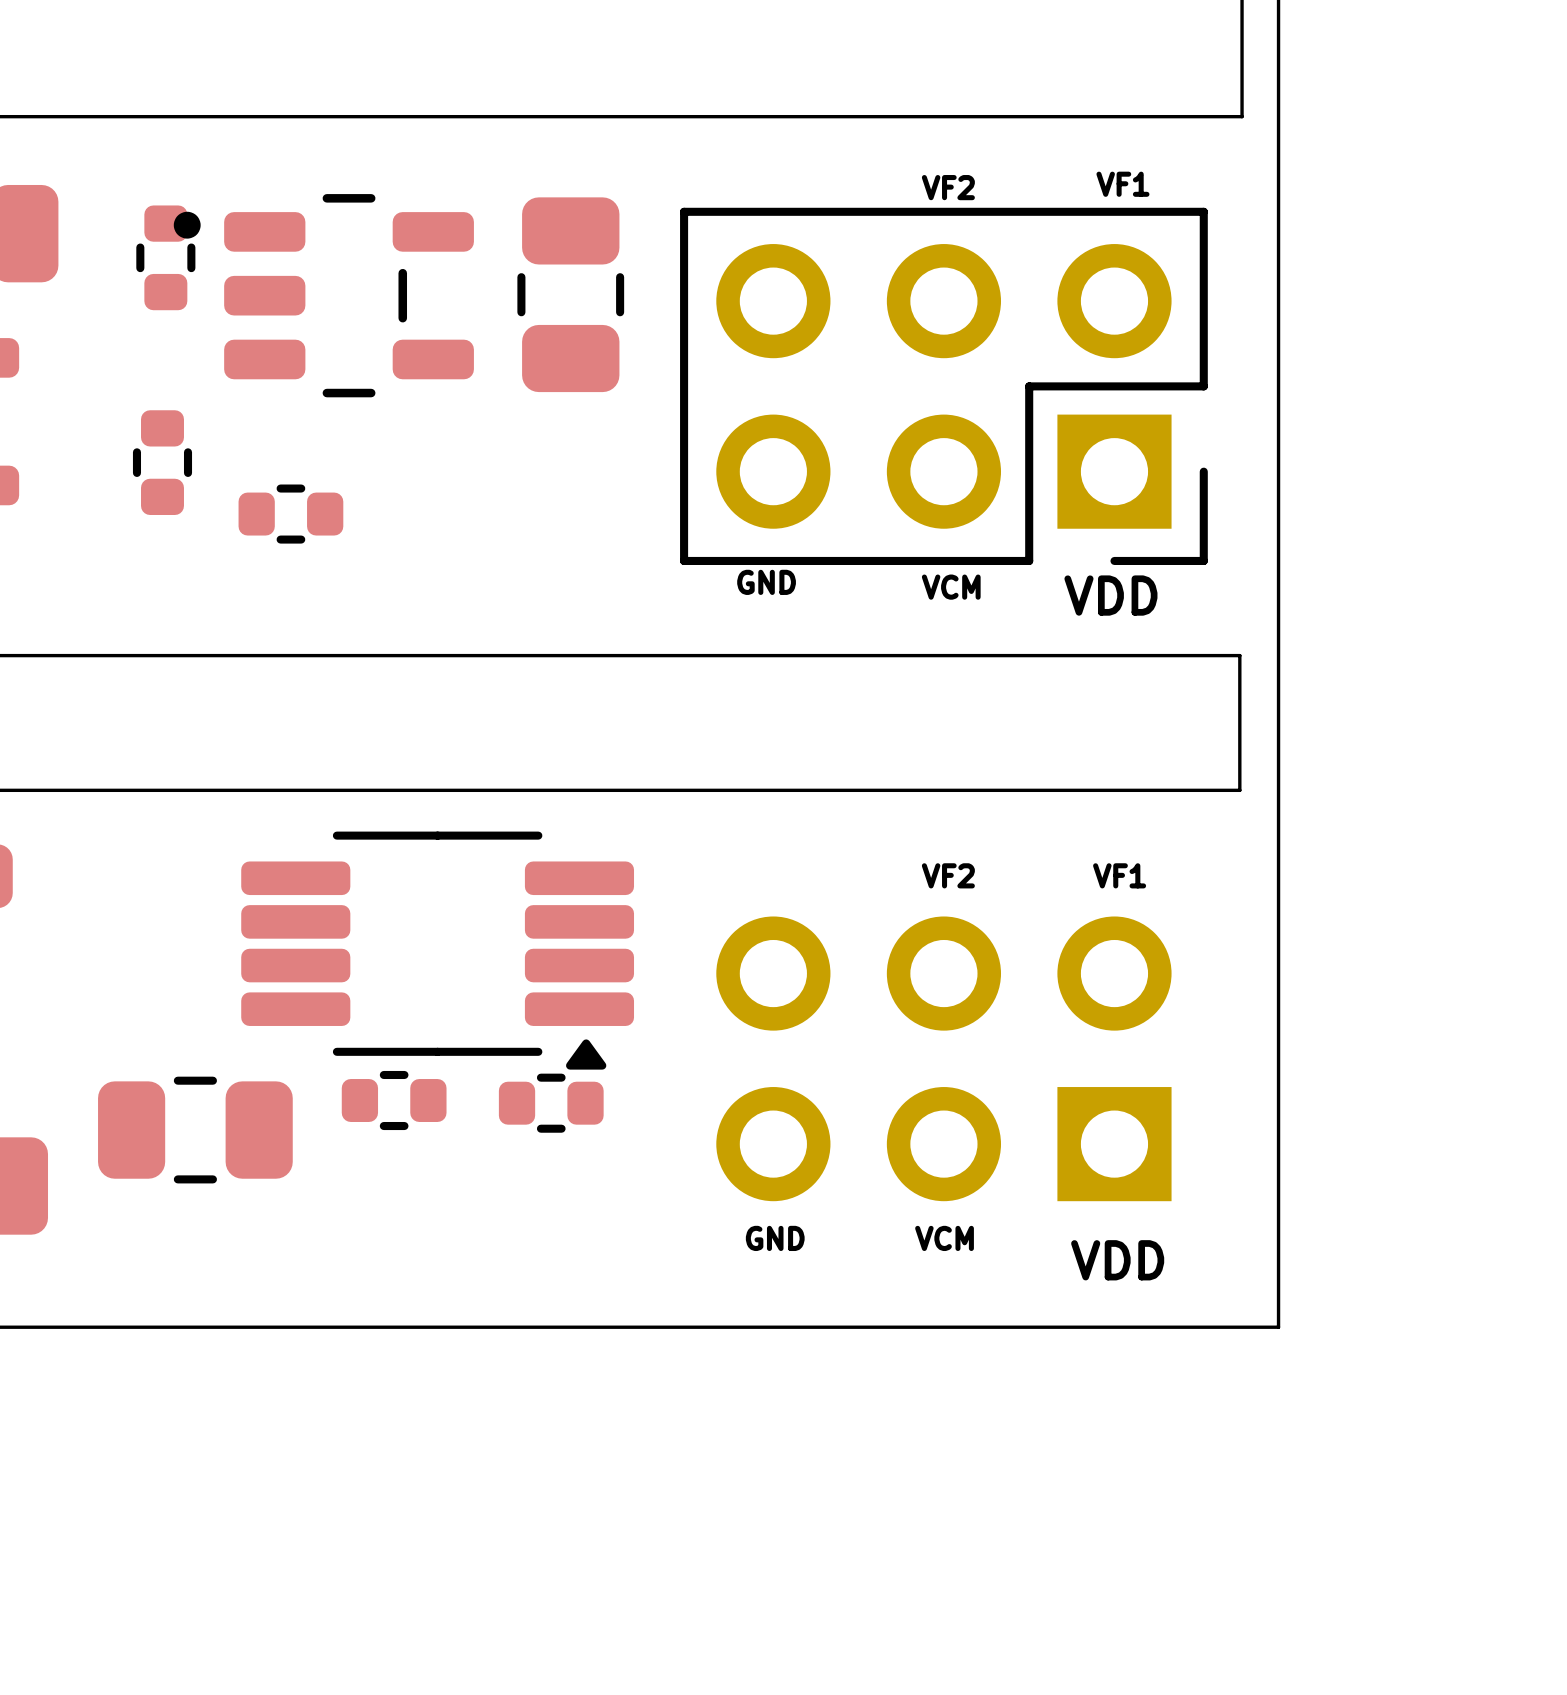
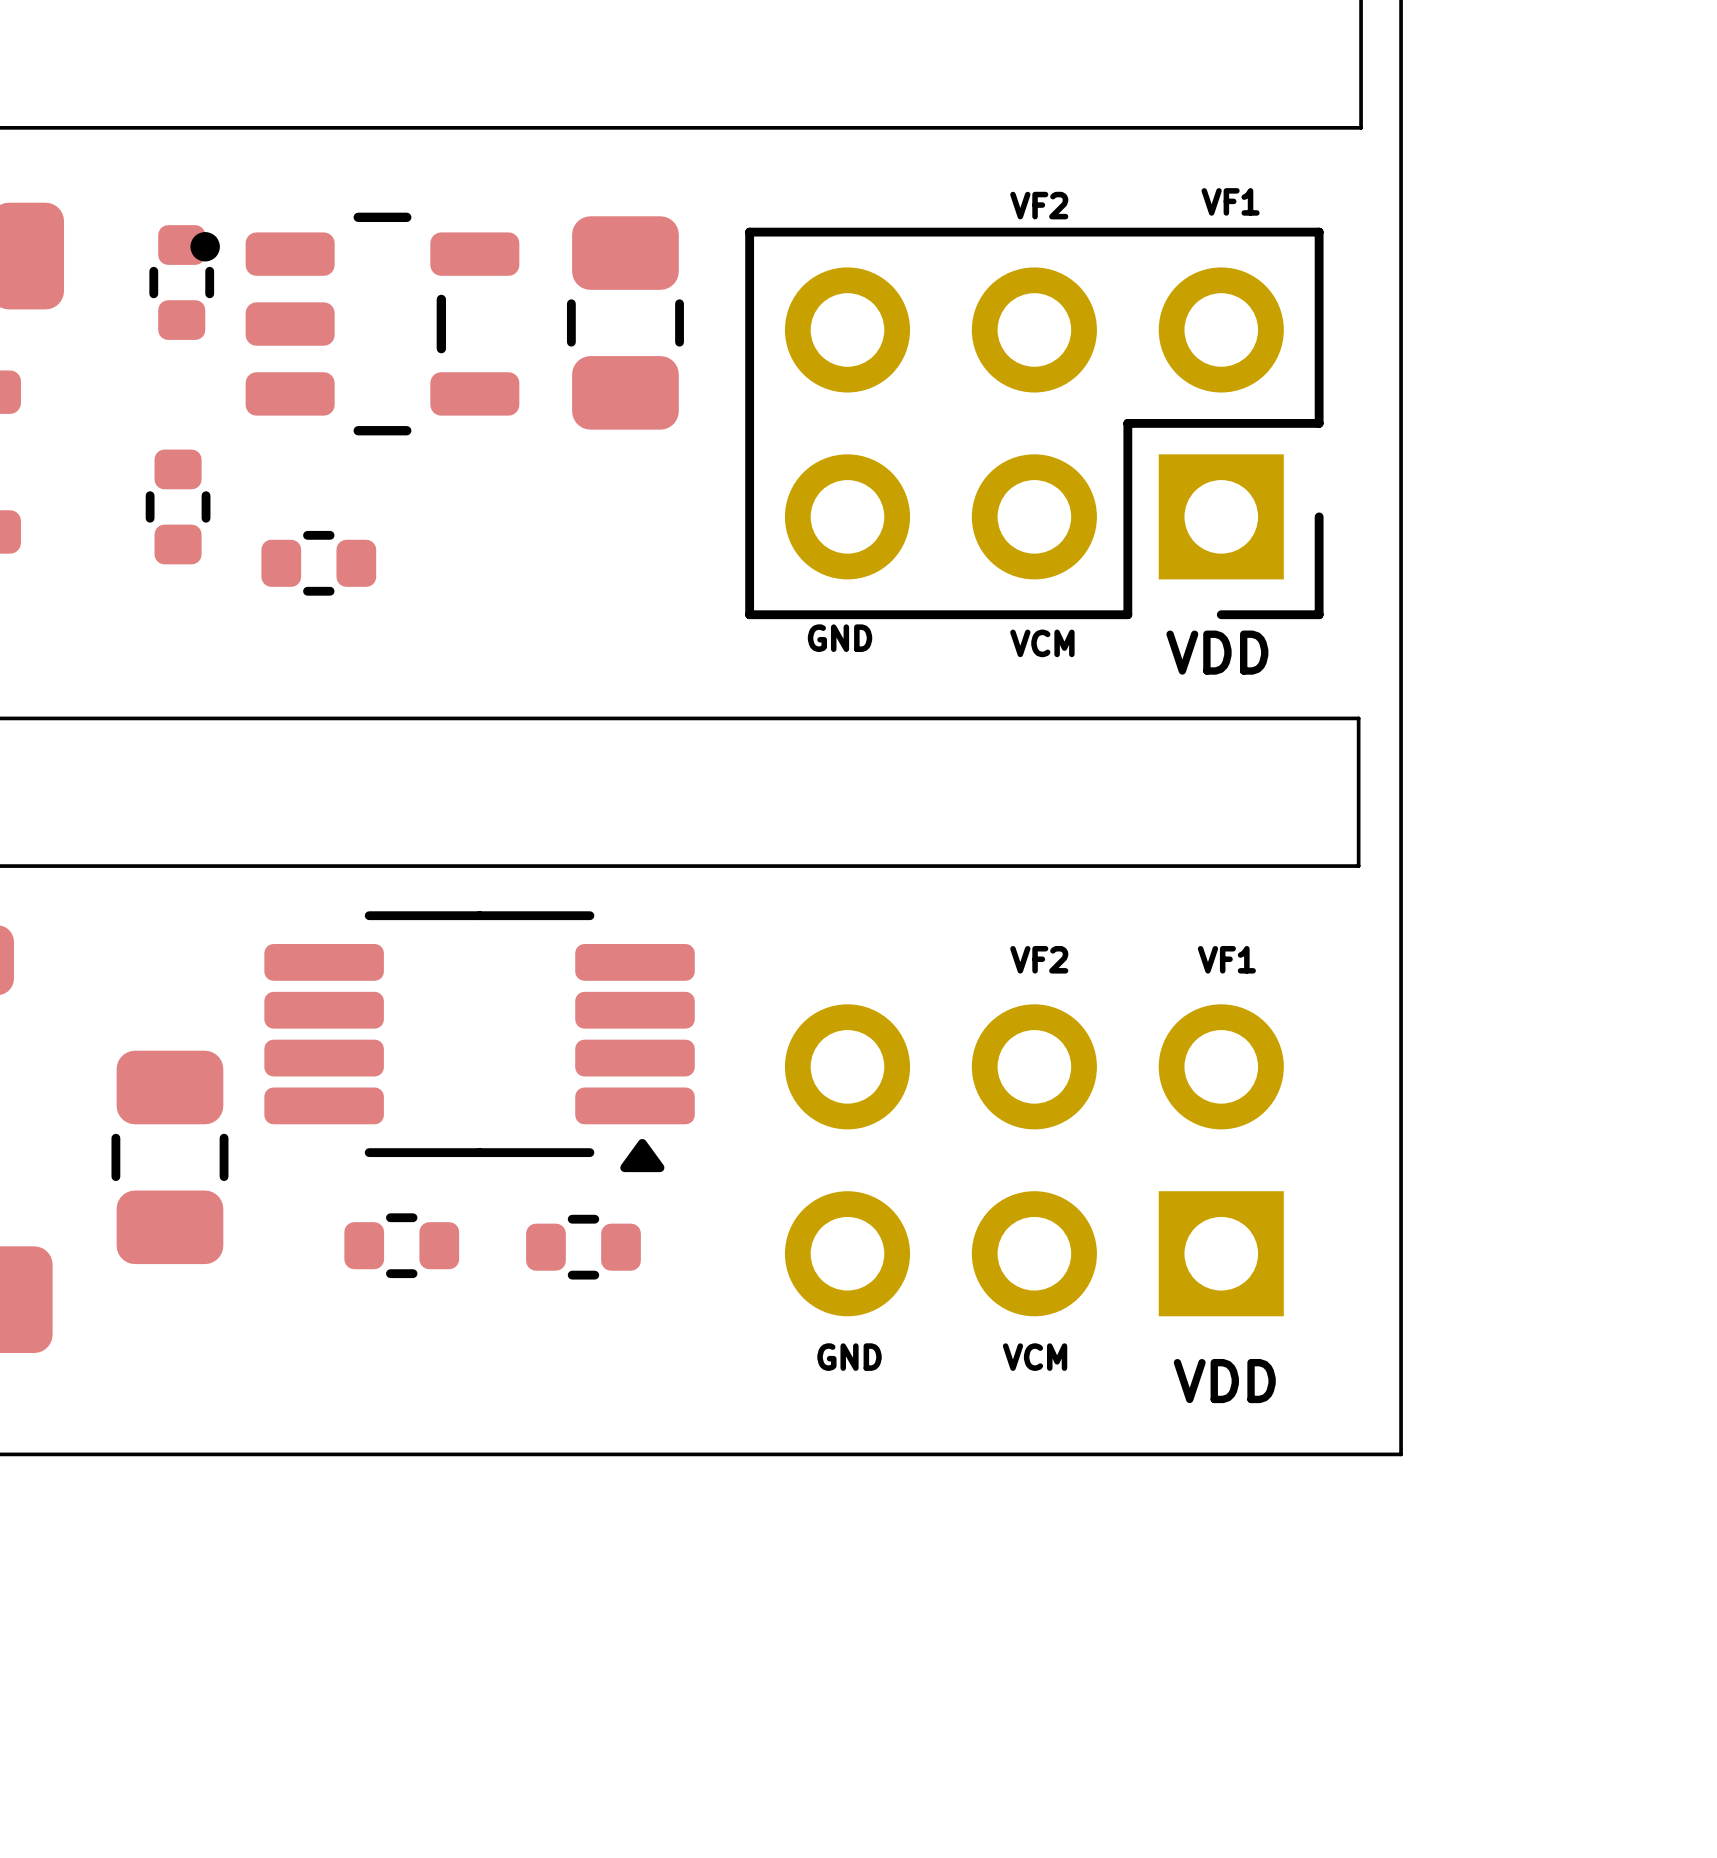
part position: (394, 1100) -> (401, 1245)
part position: (551, 1103) -> (583, 1247)
part rotation: 0° (195, 1130) -> 90° clockwise (169, 1157)

